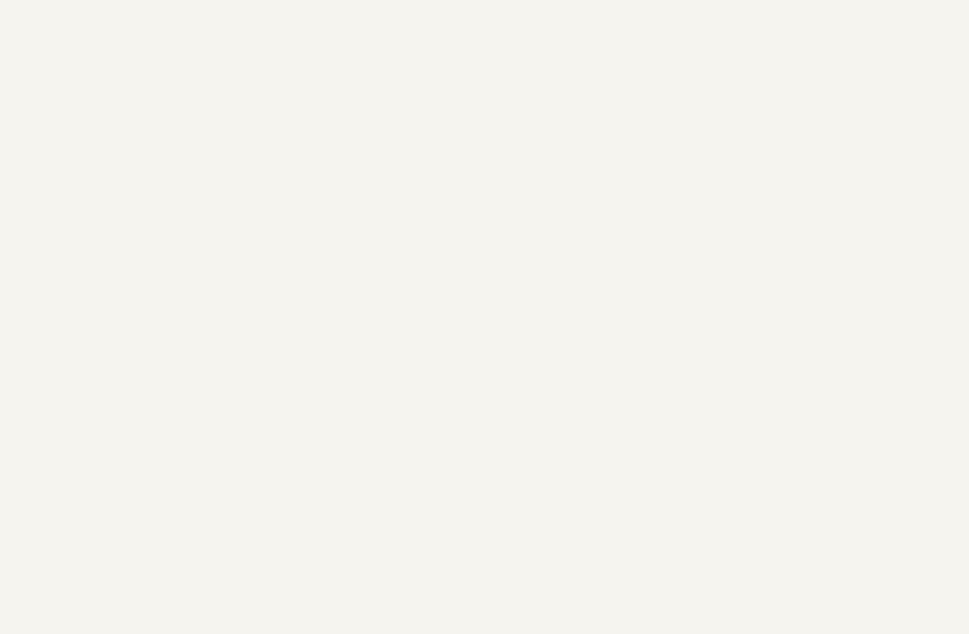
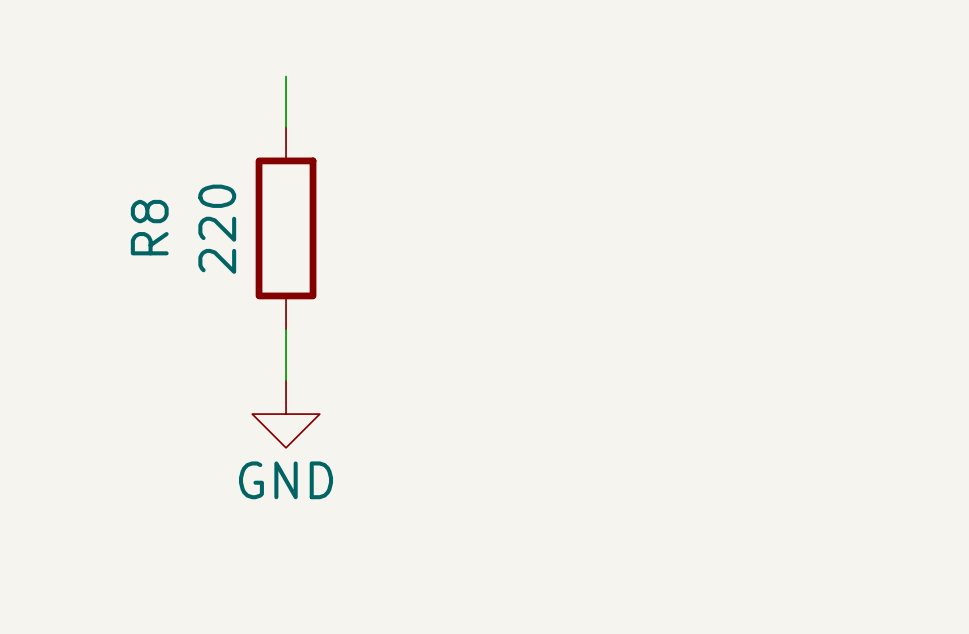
wire: none -> (286, 76) (286, 127)
R8: none -> 220 (286, 228)
wire: none -> (286, 329) (286, 380)
power symbol: none -> GND (286, 414)

